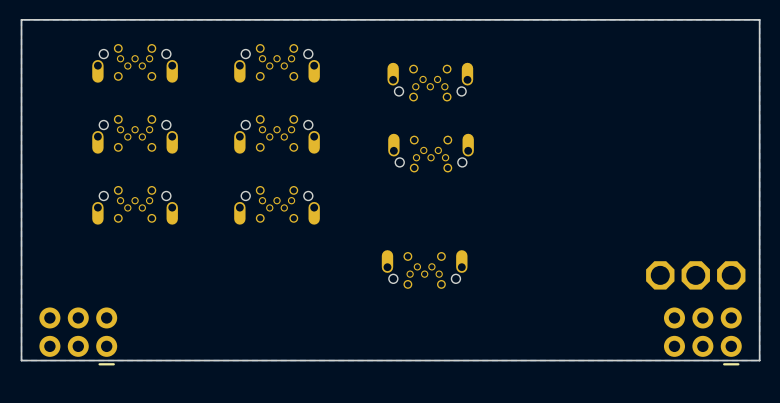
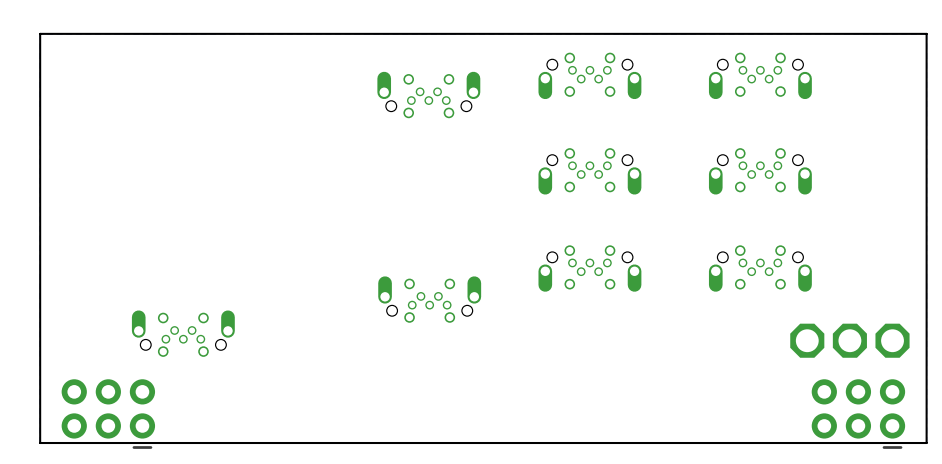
part: none -> (589, 75)
part: none -> (760, 75)
part: (135, 63) -> none
part: (277, 63) -> none
part: none -> (428, 94)
part: (430, 82) -> none
part: (135, 134) -> none
part: (277, 134) -> none
part: none -> (589, 171)
part: none -> (760, 171)
part: (431, 153) -> none
part rotation: 0° (135, 205) -> 180° (183, 333)
part position: (135, 205) -> (183, 333)
part: (277, 205) -> none
part: none -> (589, 268)
part: none -> (760, 268)
part: none -> (429, 299)
part: (424, 269) -> none

